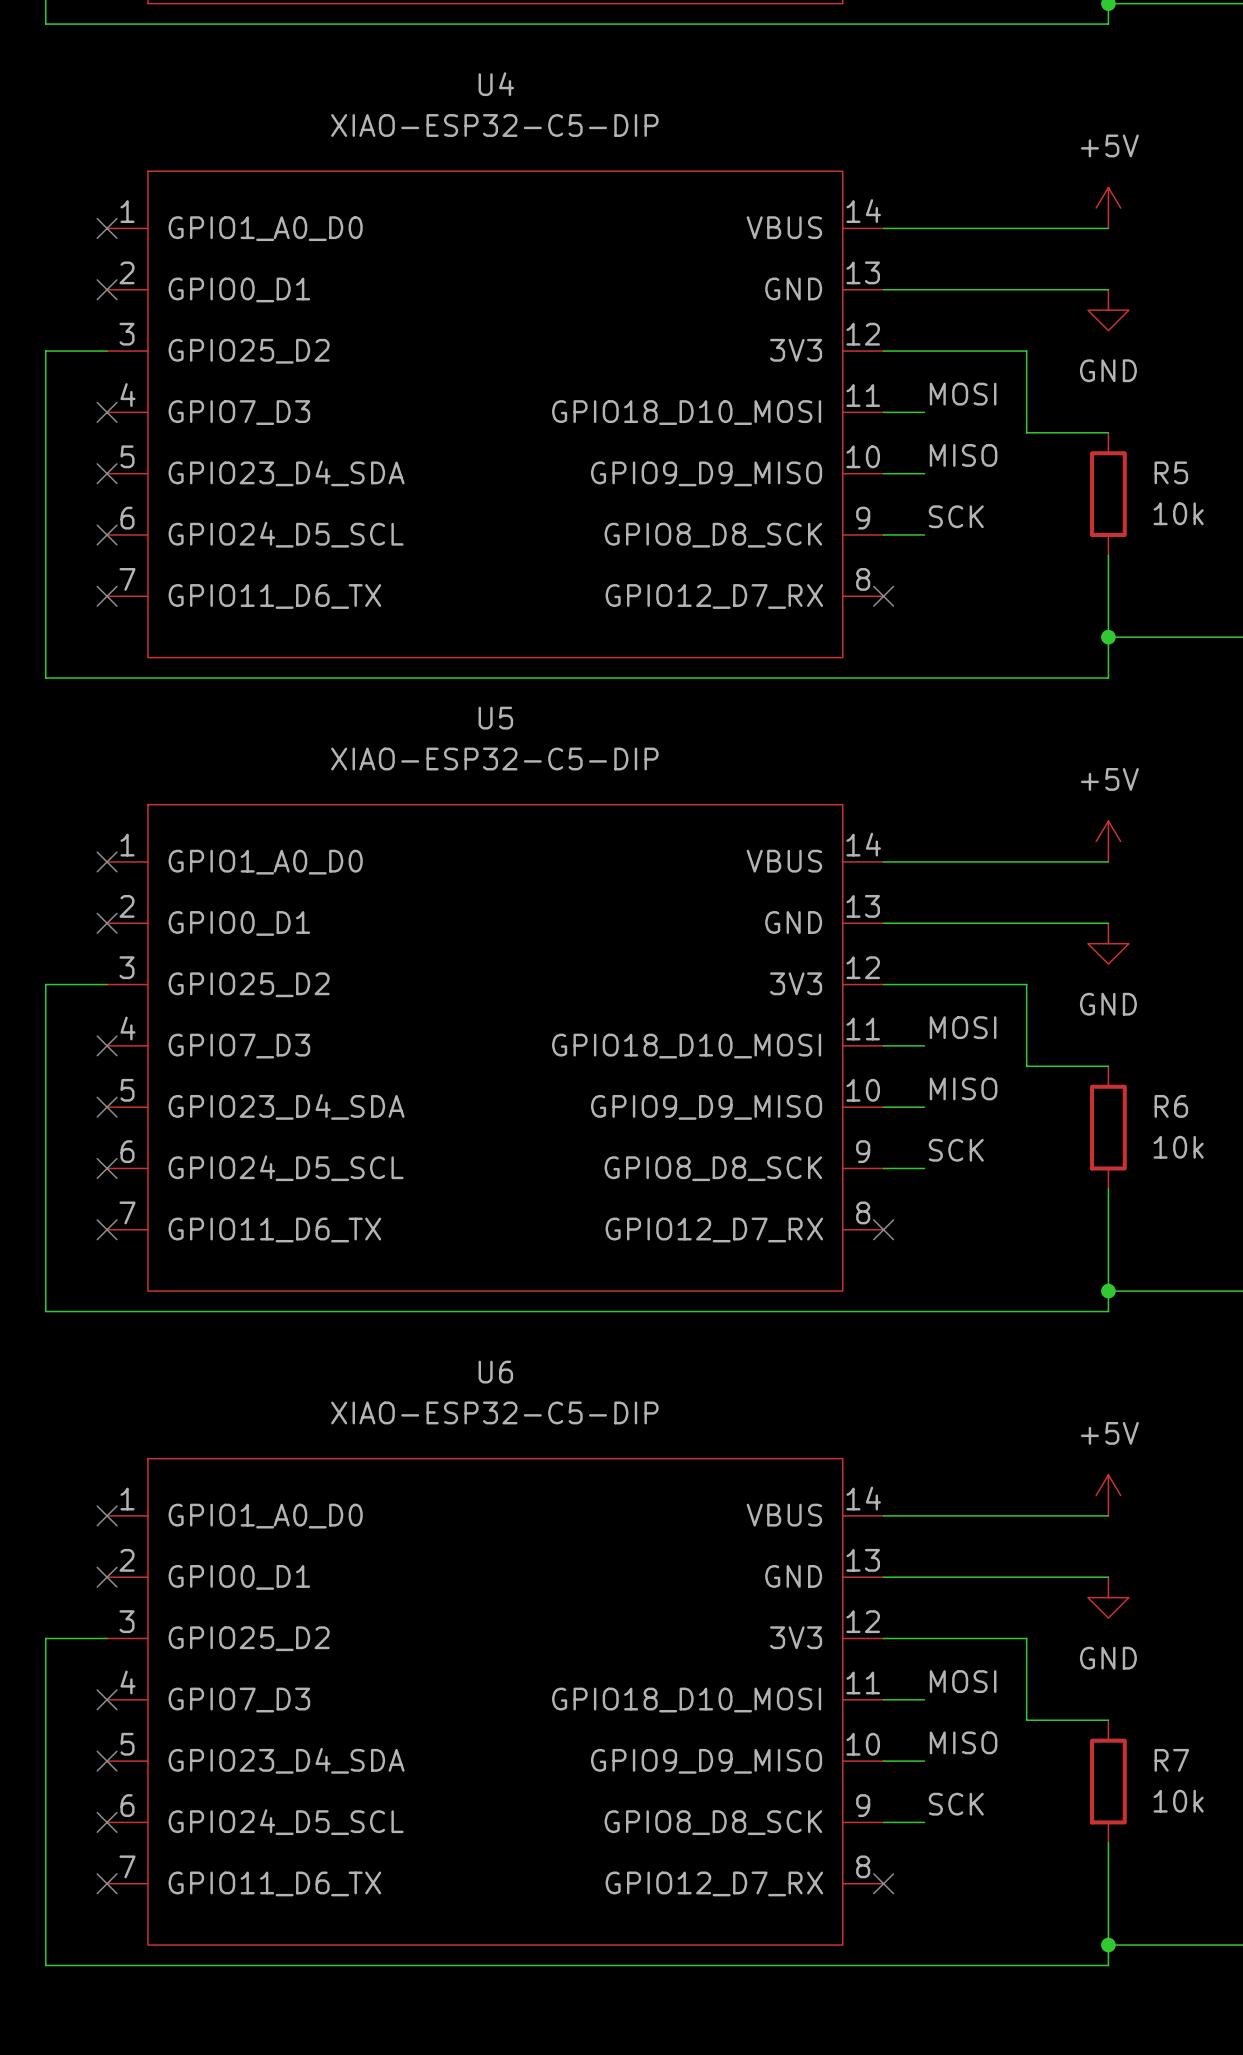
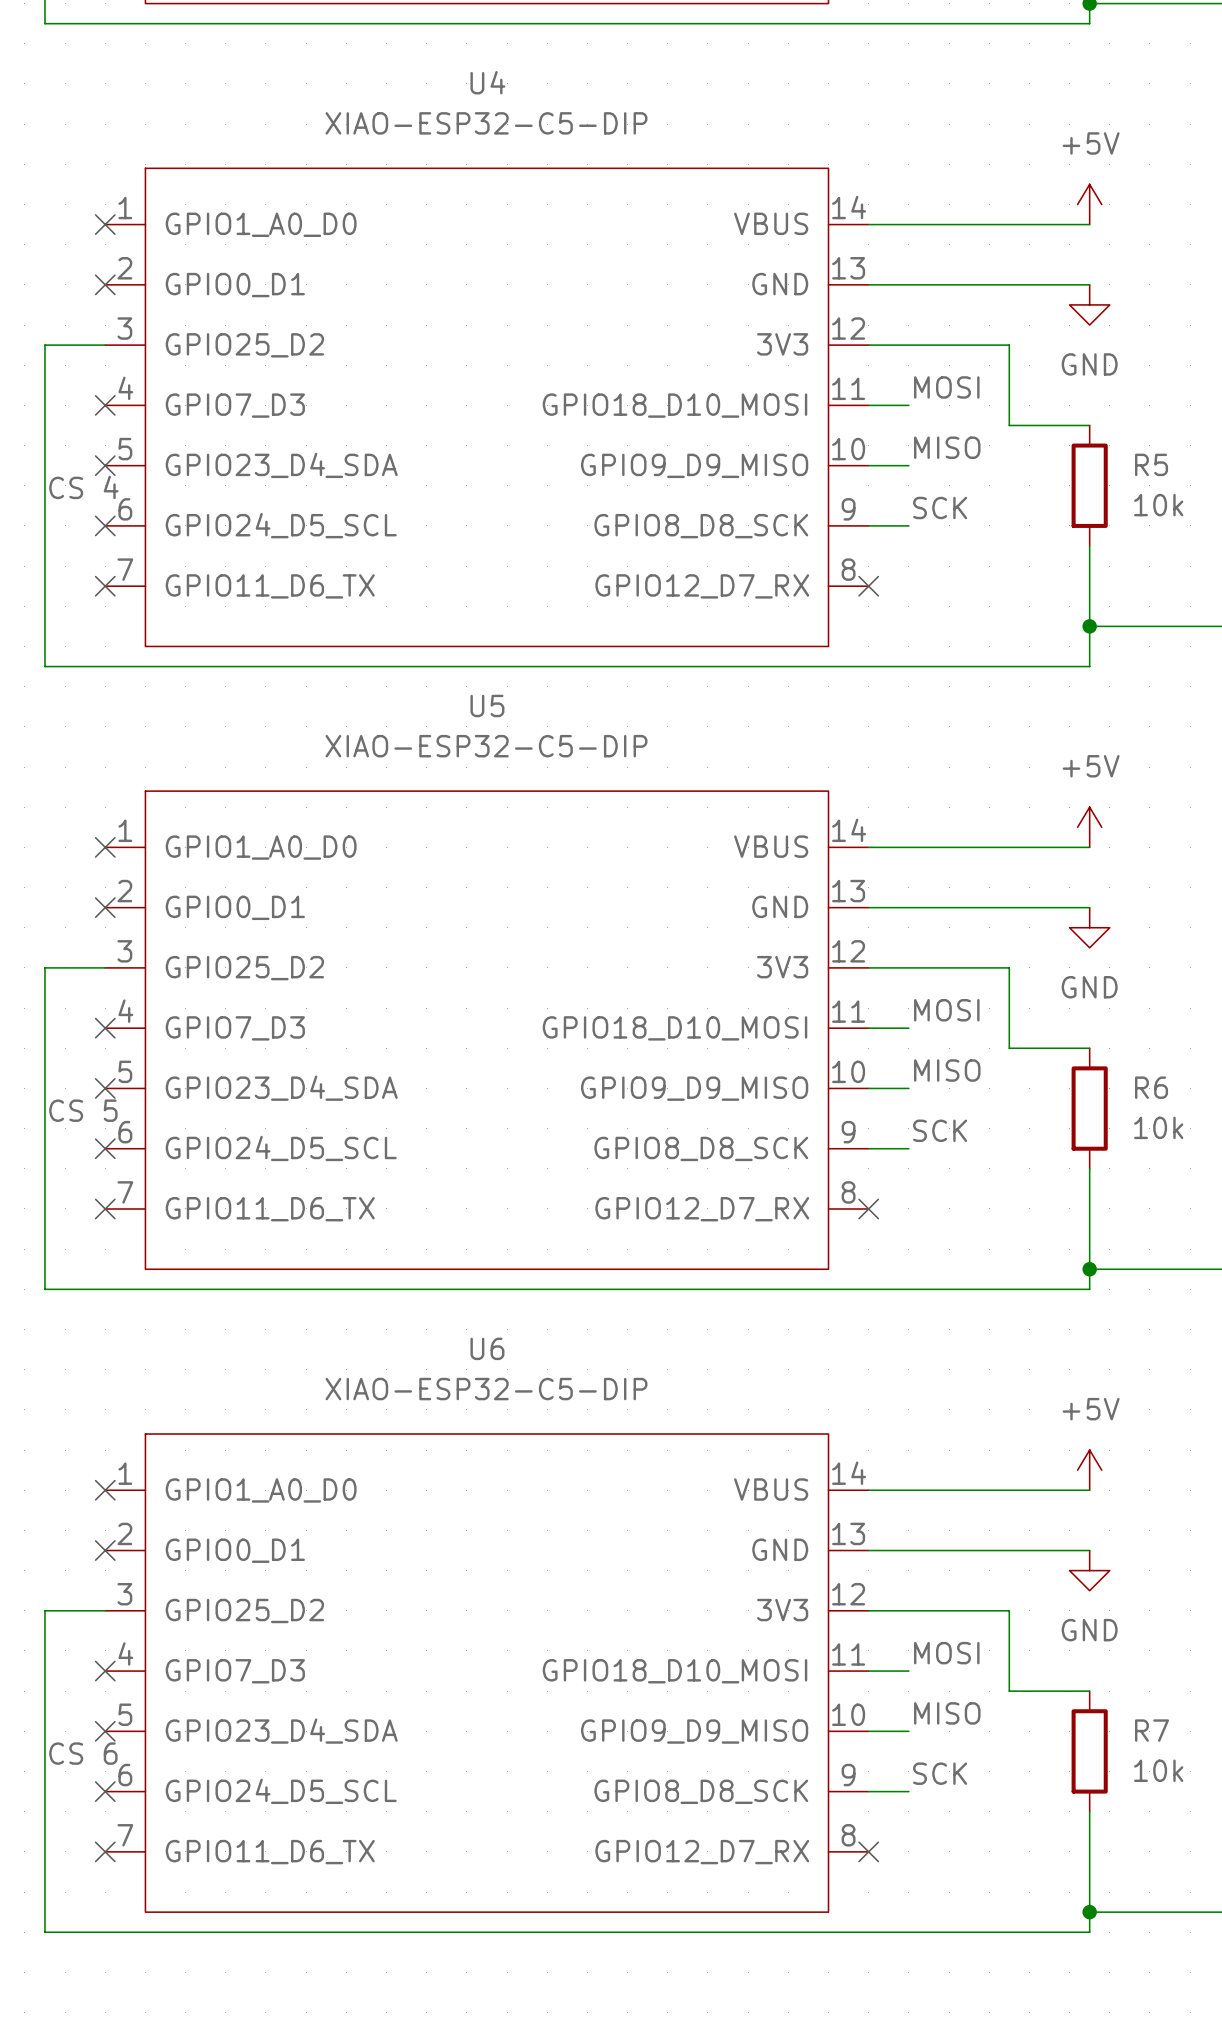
label: none -> CS 4 (83, 487)
label: none -> CS 5 (83, 1110)
label: none -> CS 6 (83, 1753)

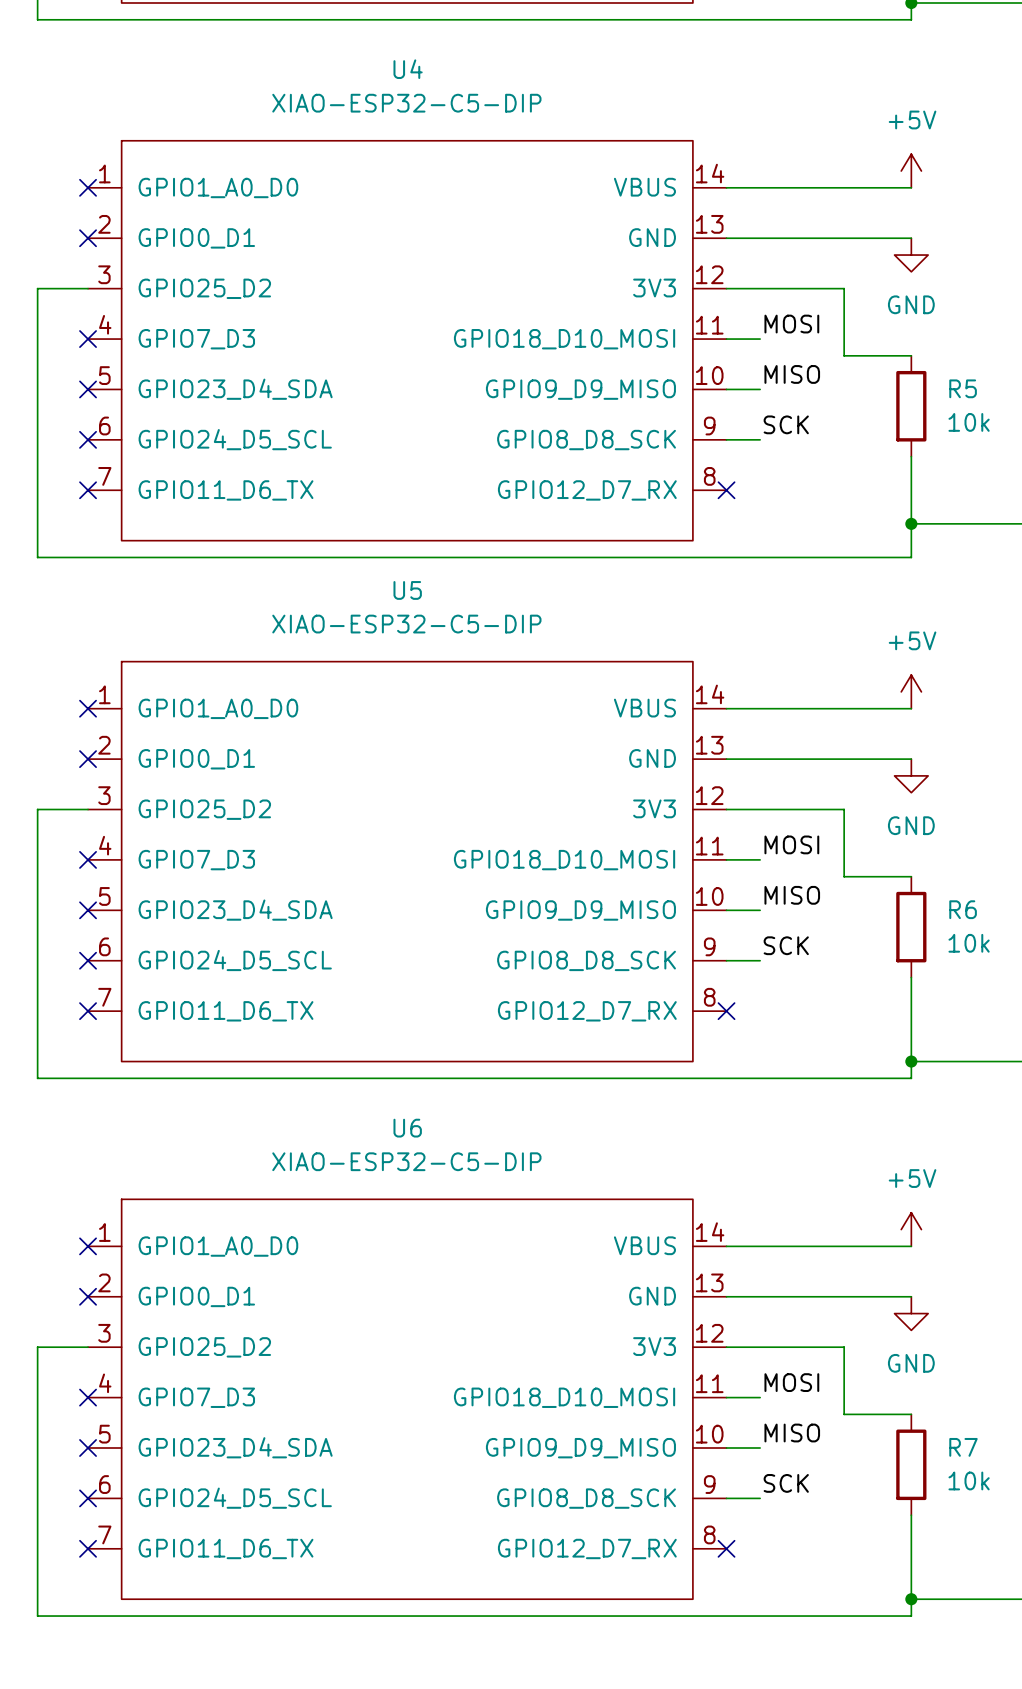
label: CS 4 (83, 487) -> none
label: CS 5 (83, 1110) -> none
label: CS 6 (83, 1753) -> none

